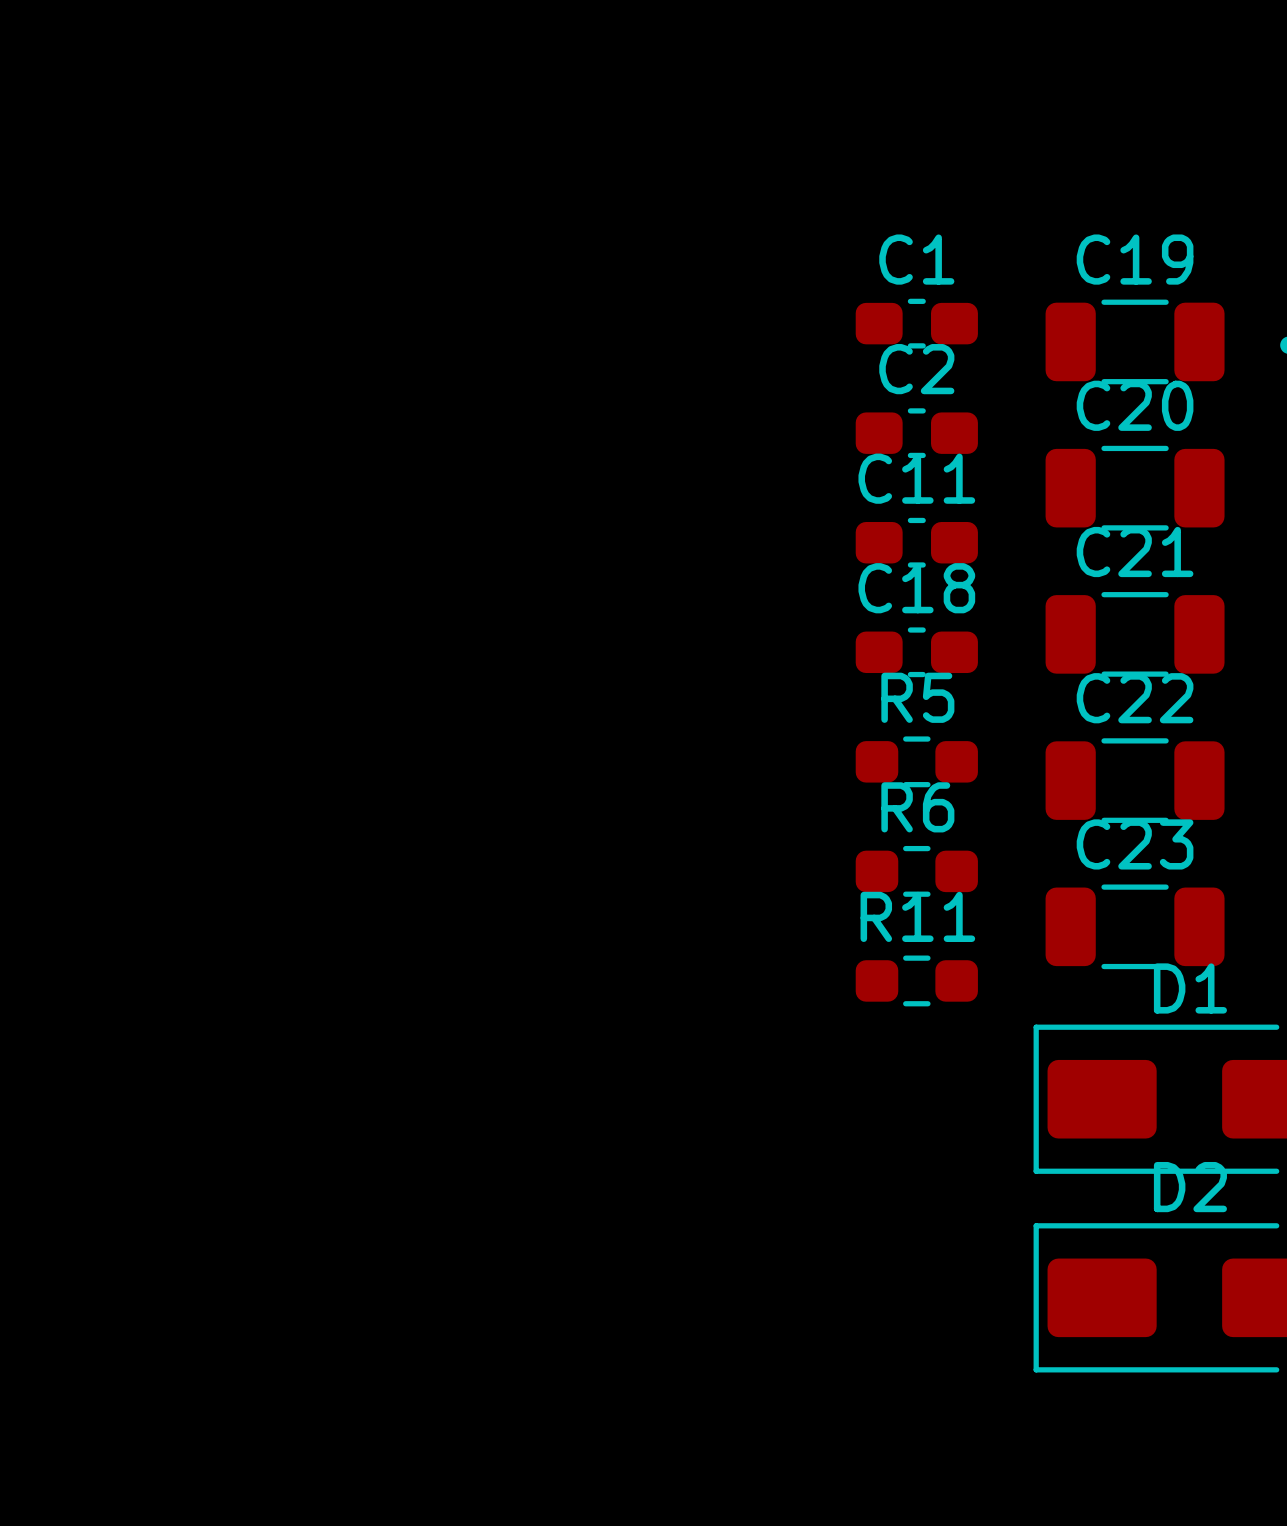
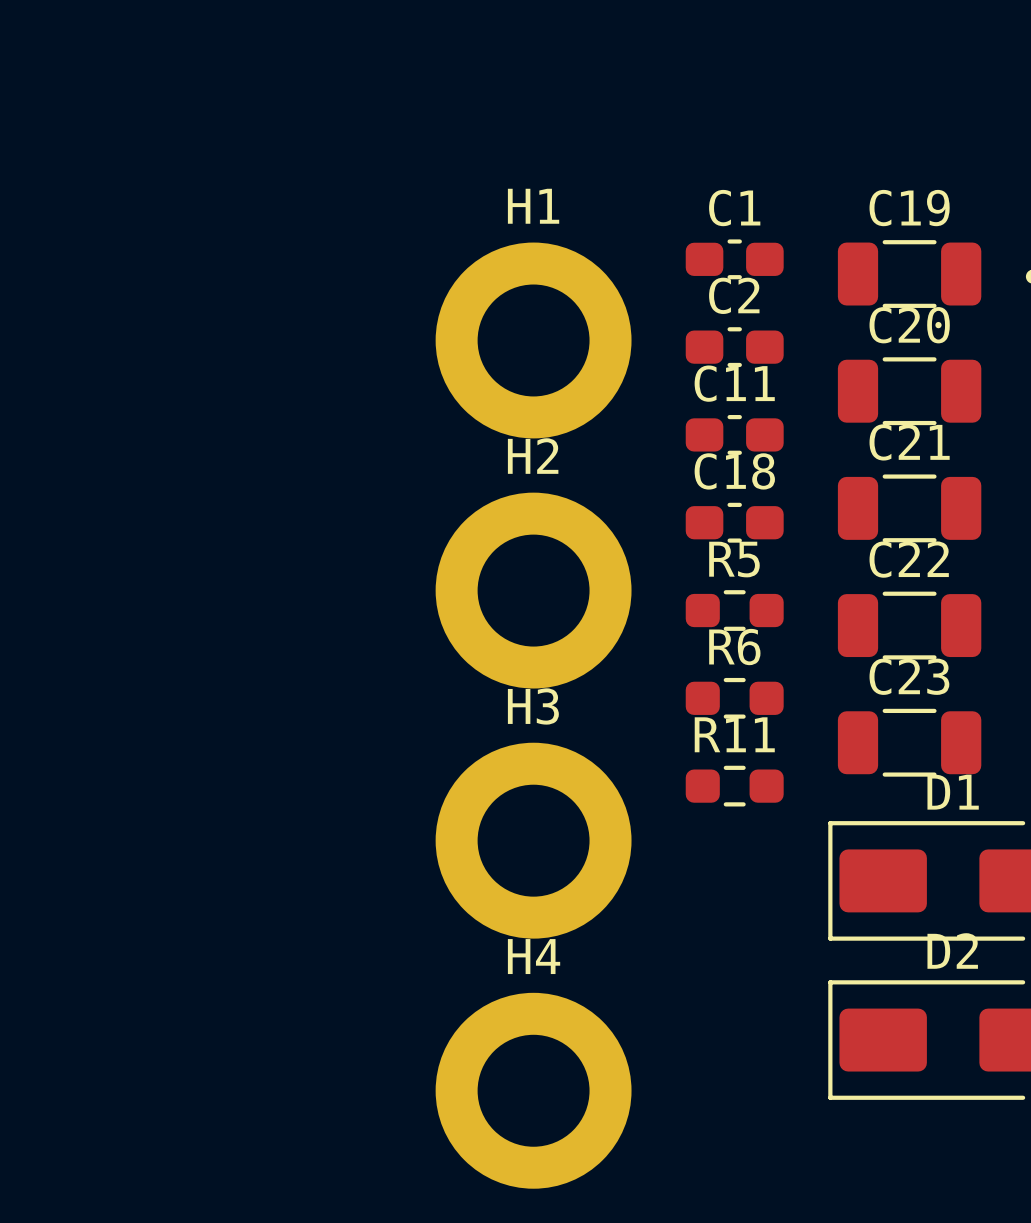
H1: none -> (533, 340)
H2: none -> (533, 590)
H3: none -> (533, 840)
H4: none -> (533, 1090)

